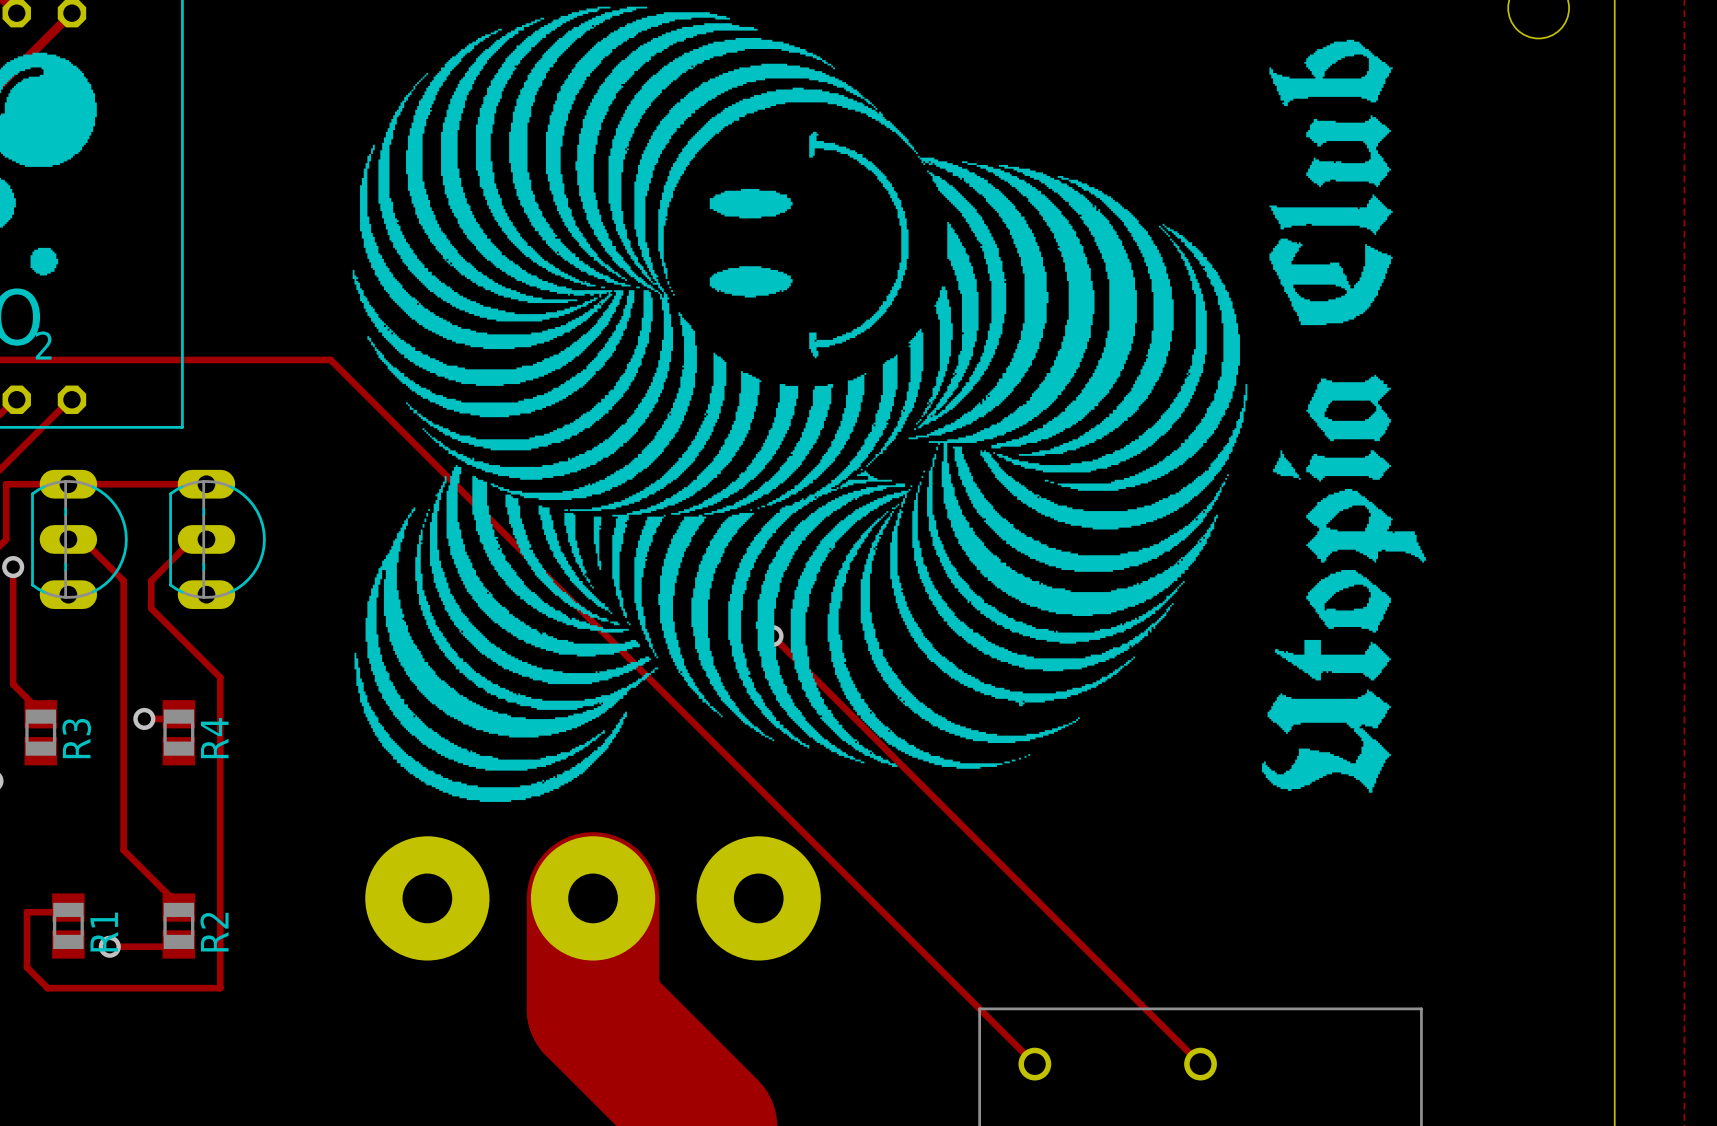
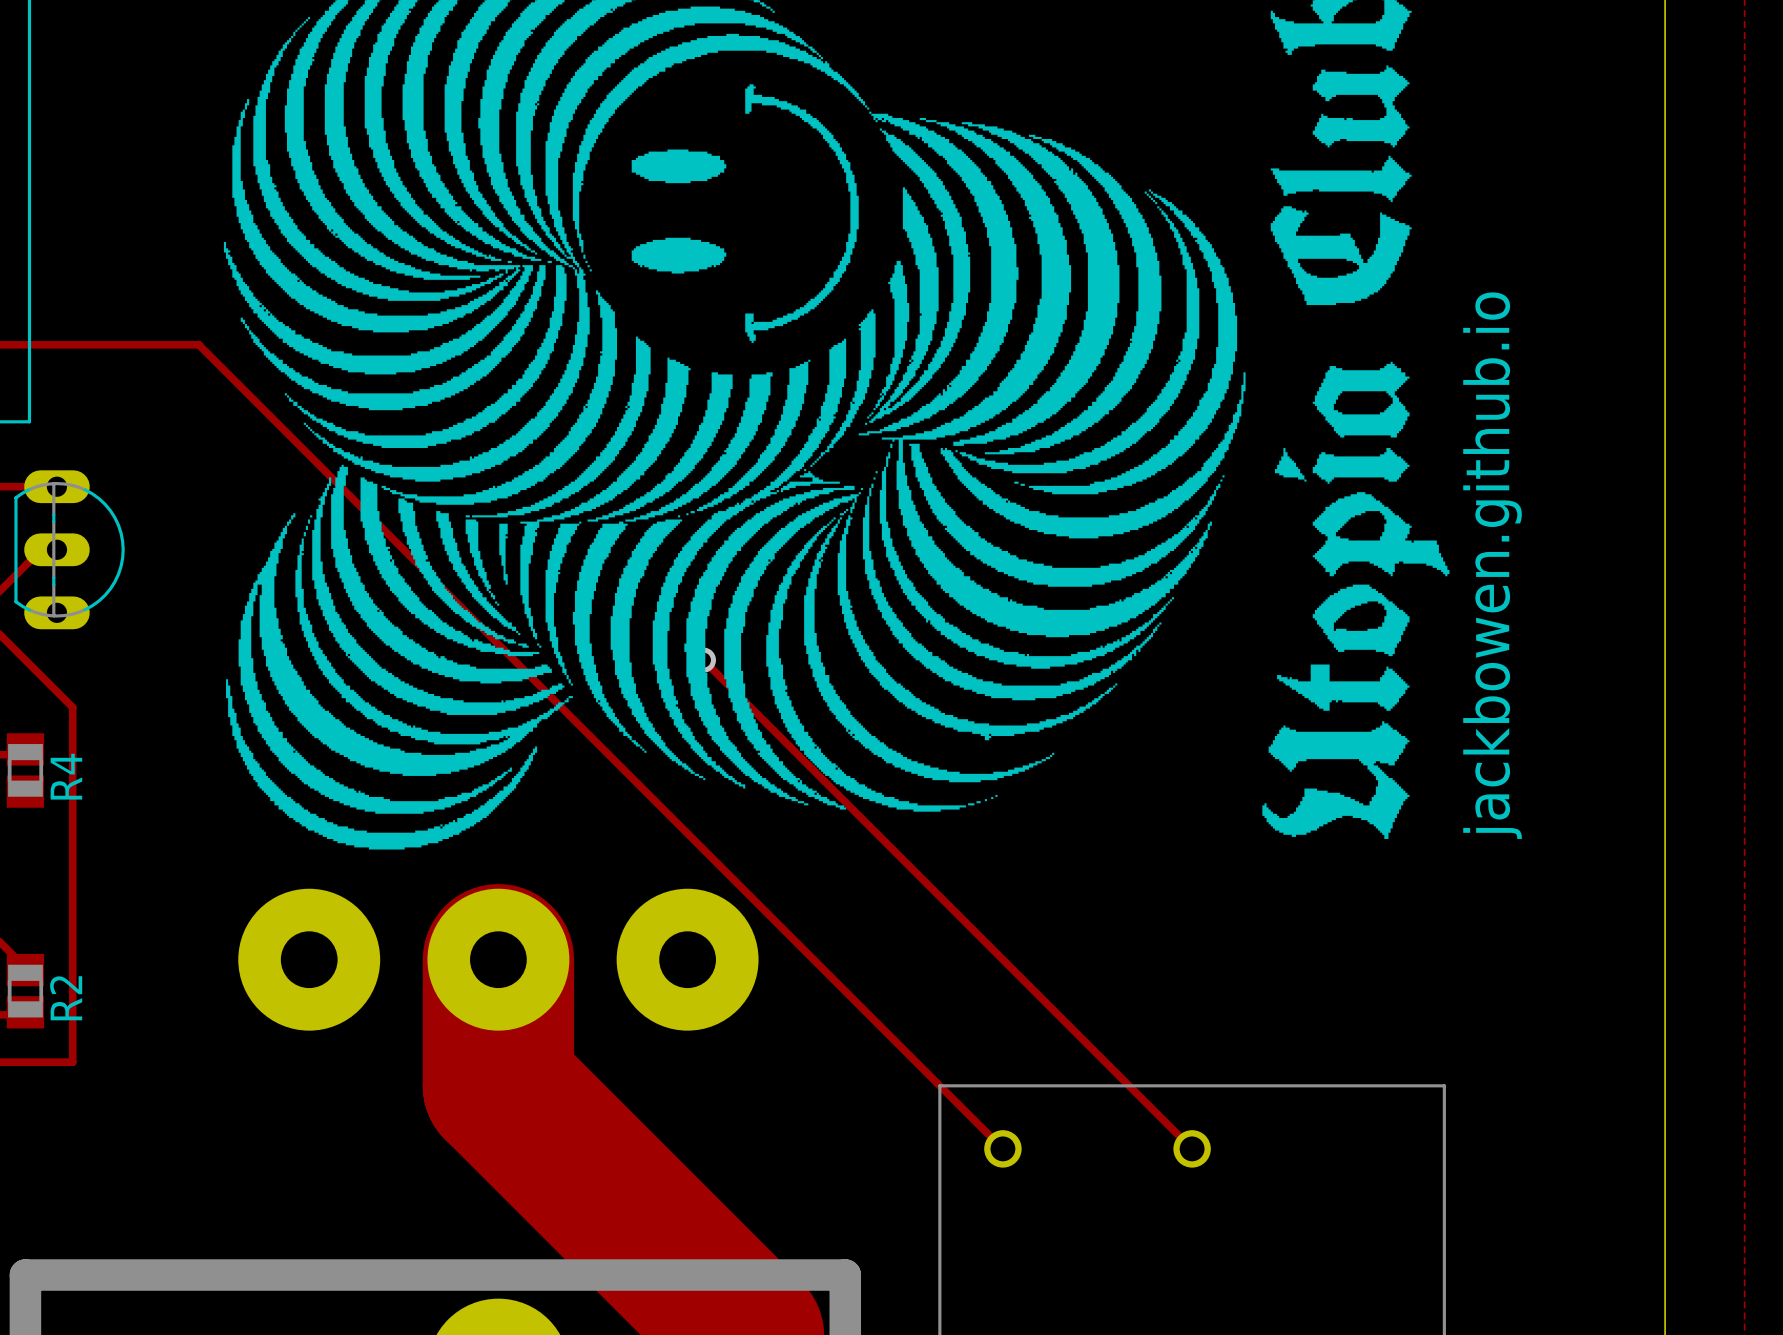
text: none -> jackbowen.github.io (1492, 565)

